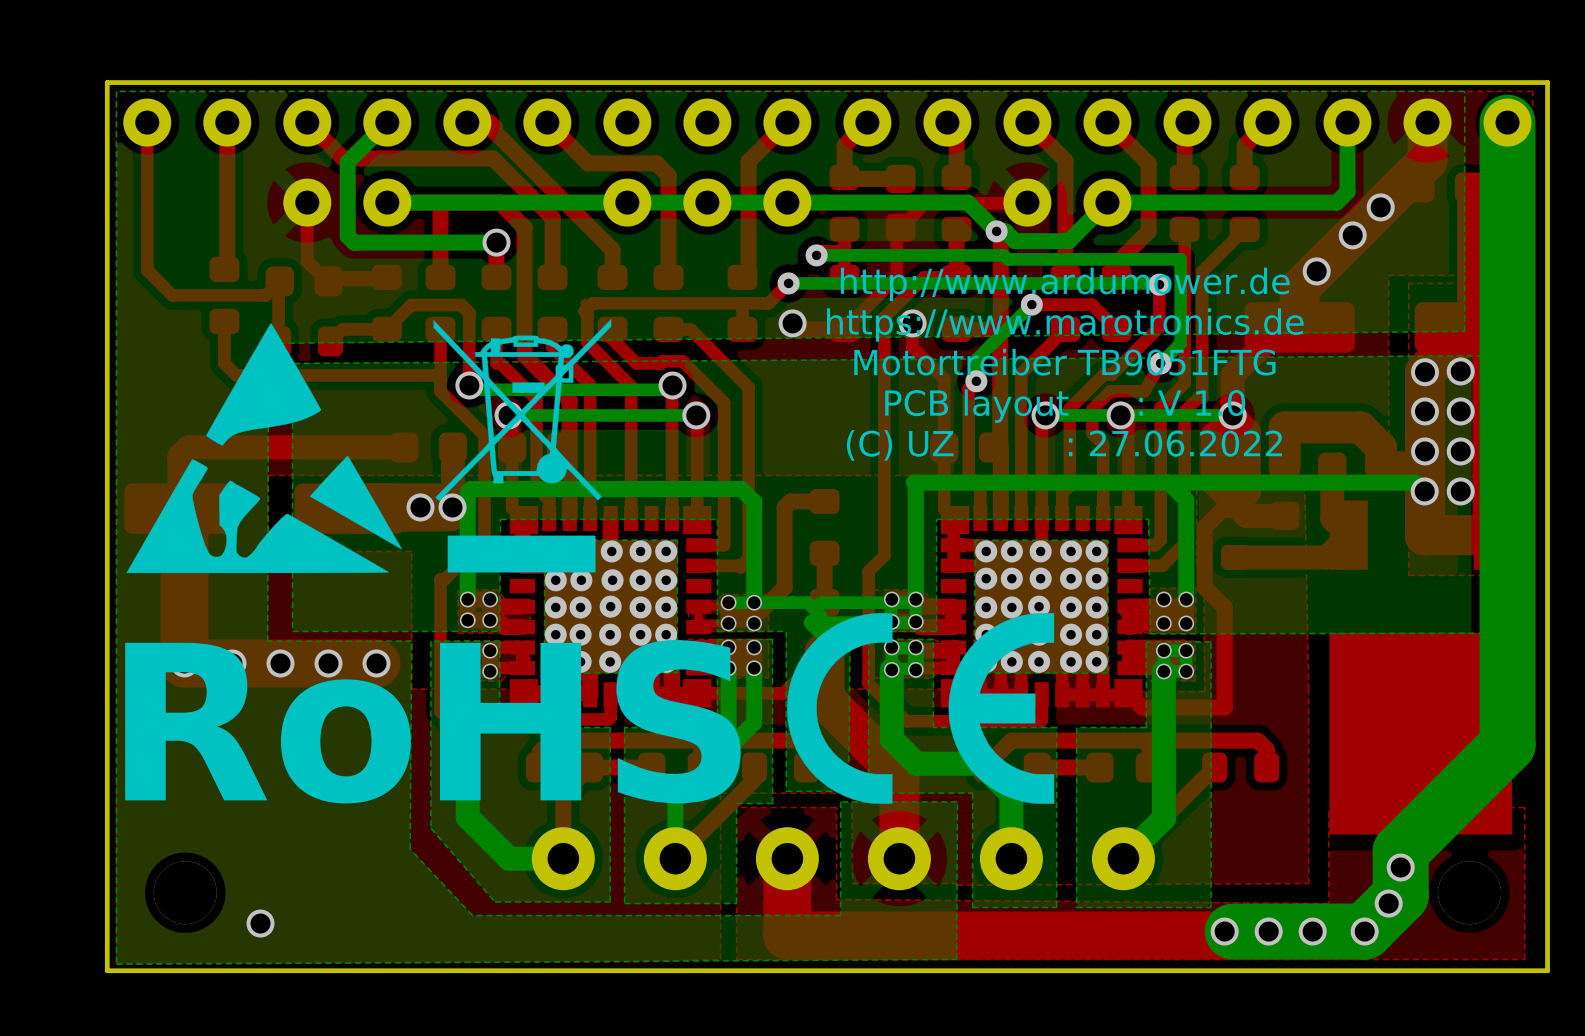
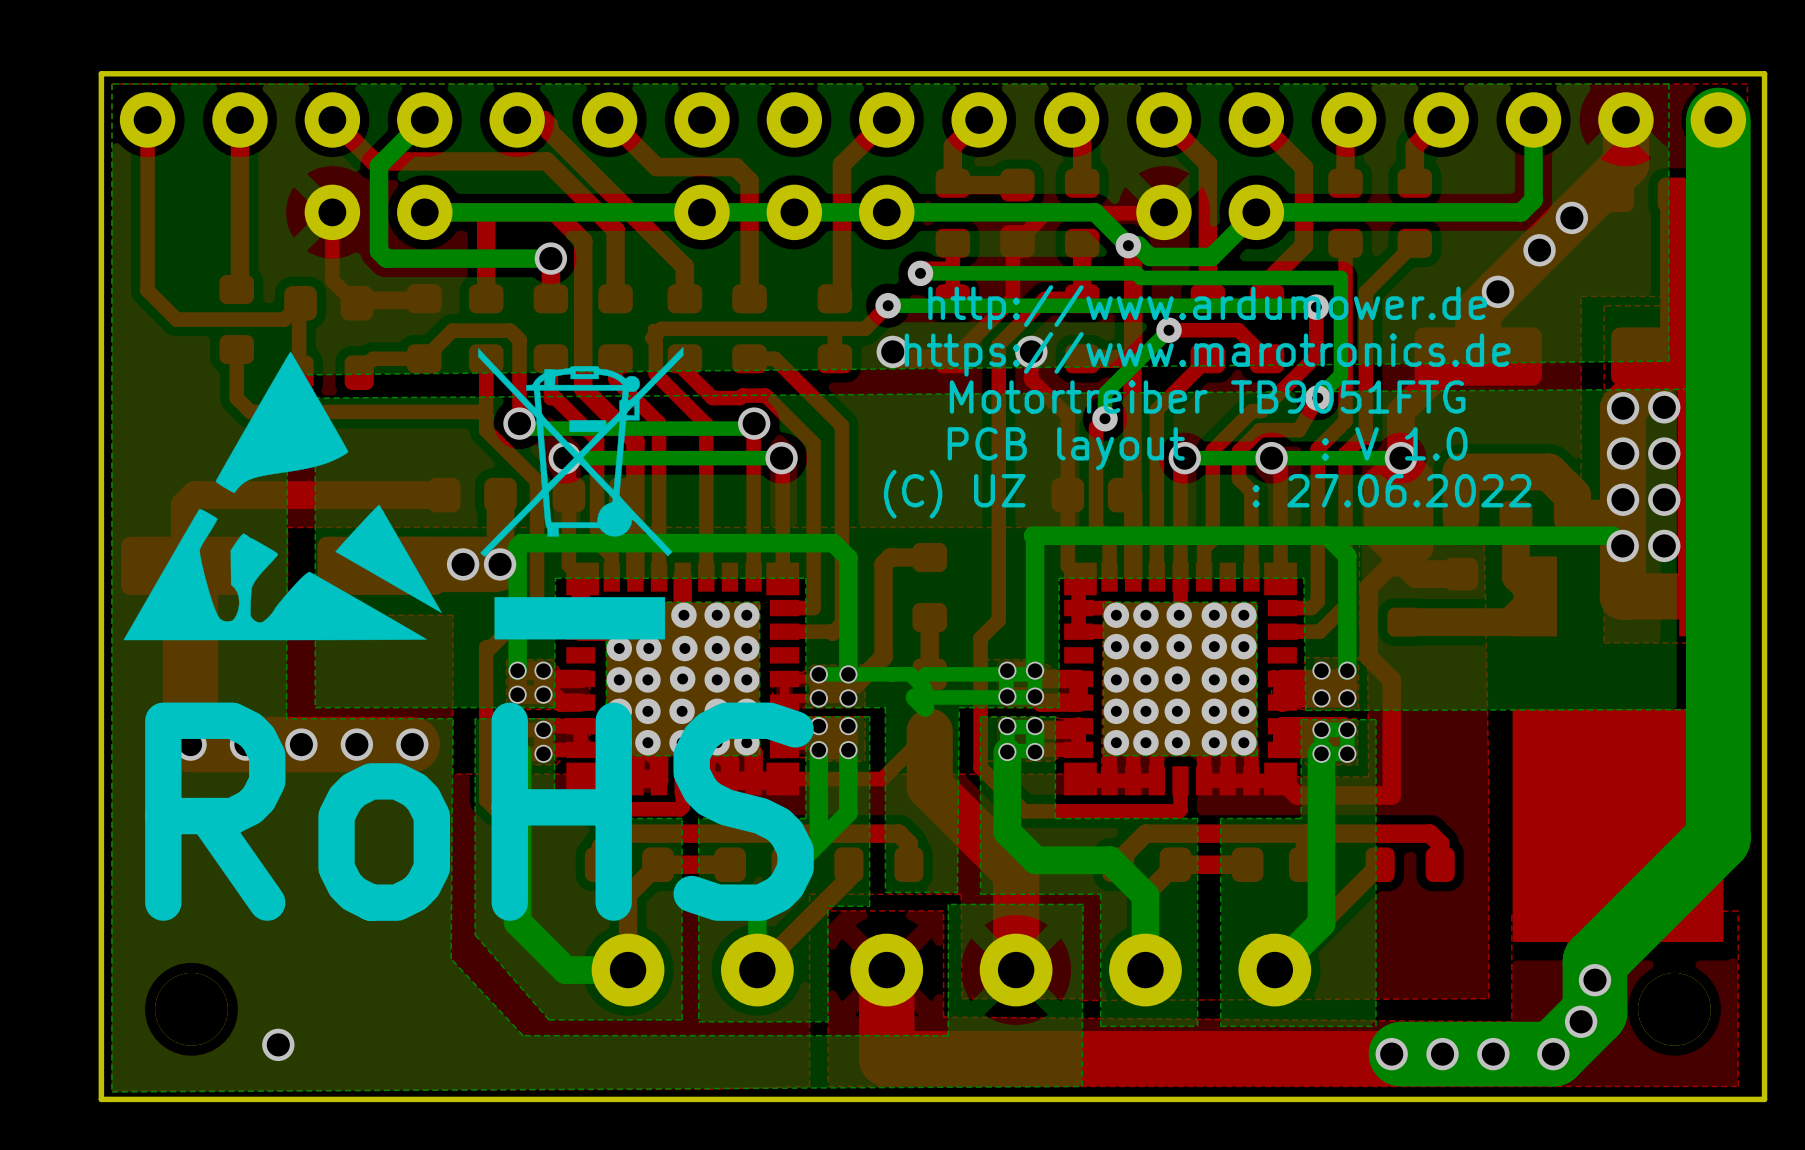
drawing: [787, 613, 1055, 804] -> none

